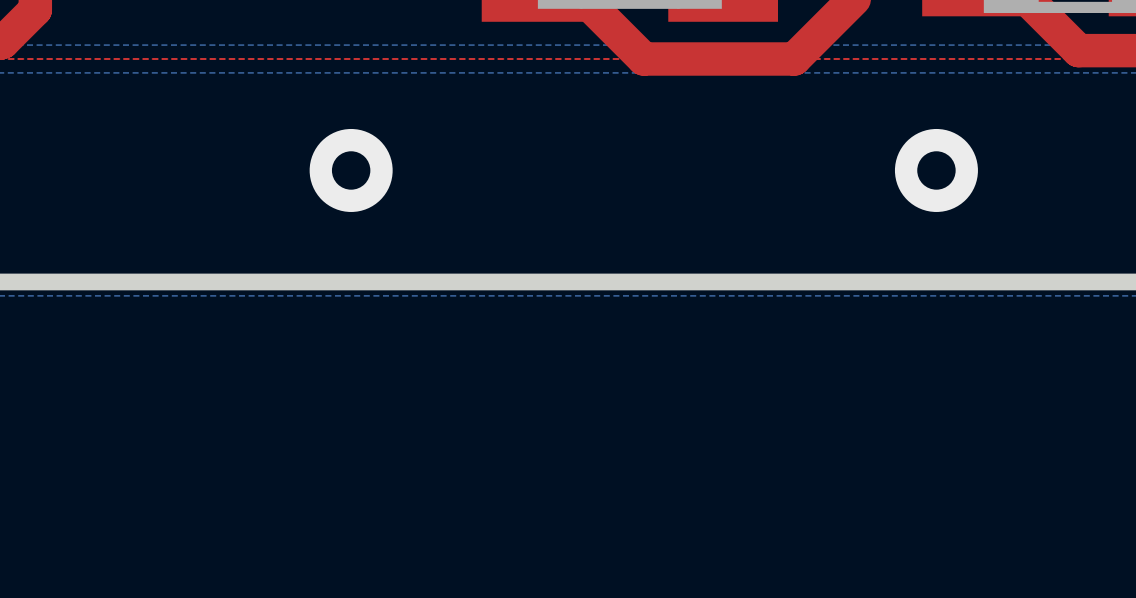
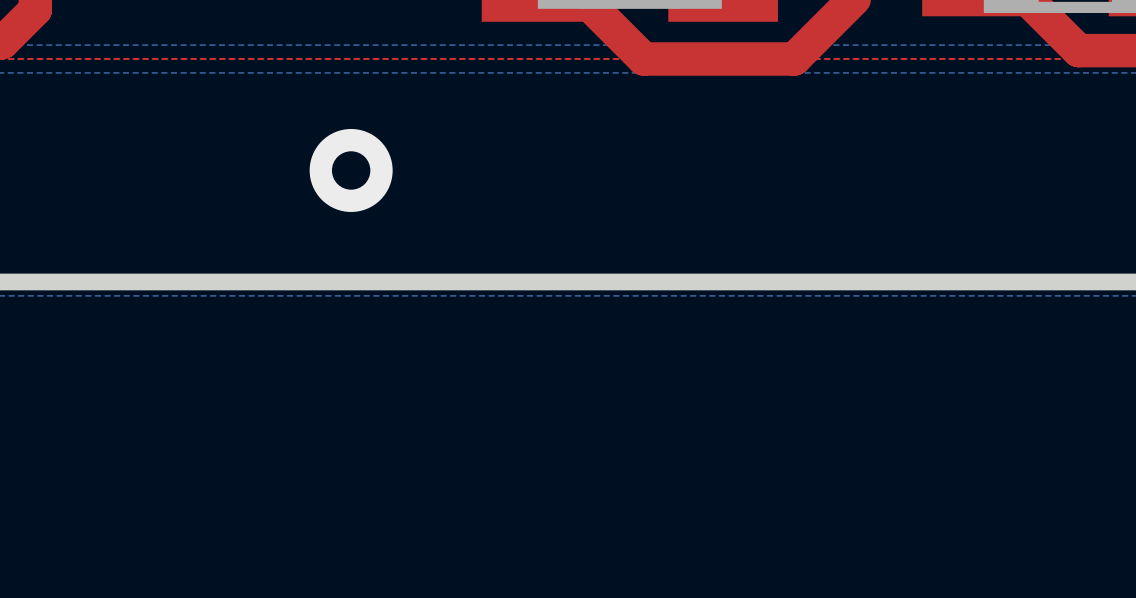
via: (936, 170) -> none

